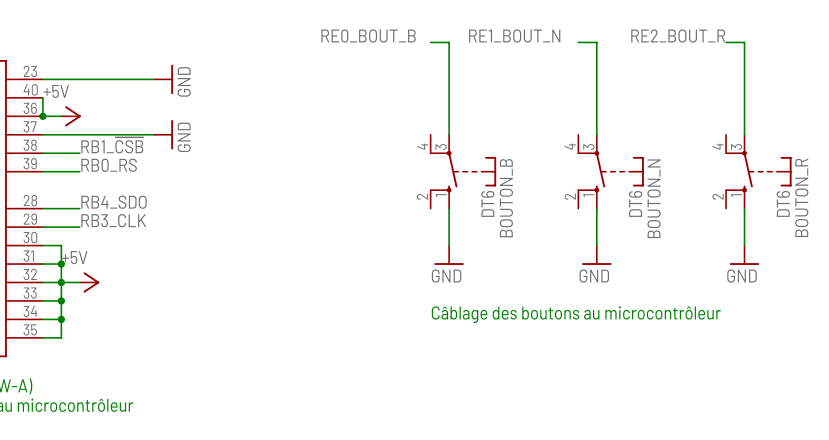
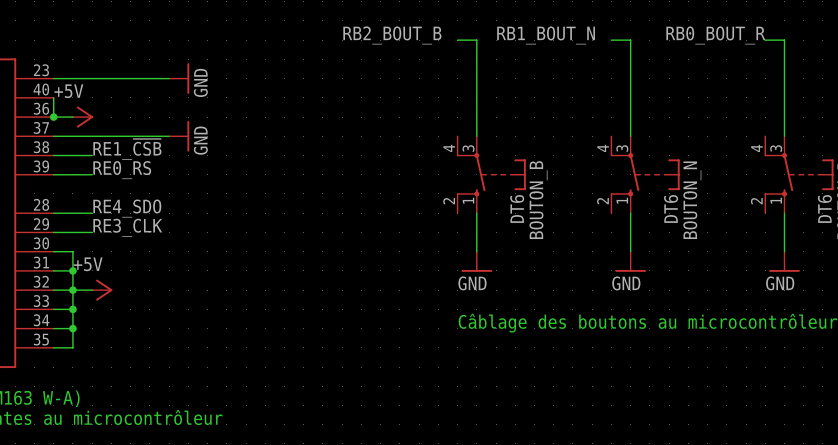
label: RE1_BOUT_N (514, 35) -> RB1_BOUT_N (546, 35)
label: RE2_BOUT_R (678, 35) -> RB0_BOUT_R (715, 35)
label: RE0_BOUT_B (368, 36) -> RB2_BOUT_B (392, 35)
label: RB1_~{CSB} (112, 145) -> RE1_~{CSB} (127, 149)
label: RB0_RS (109, 165) -> RE0_RS (122, 170)
label: RB4_SDO (114, 202) -> RE4_SDO (127, 208)
label: RB3_CLK (113, 220) -> RE3_CLK (127, 227)

